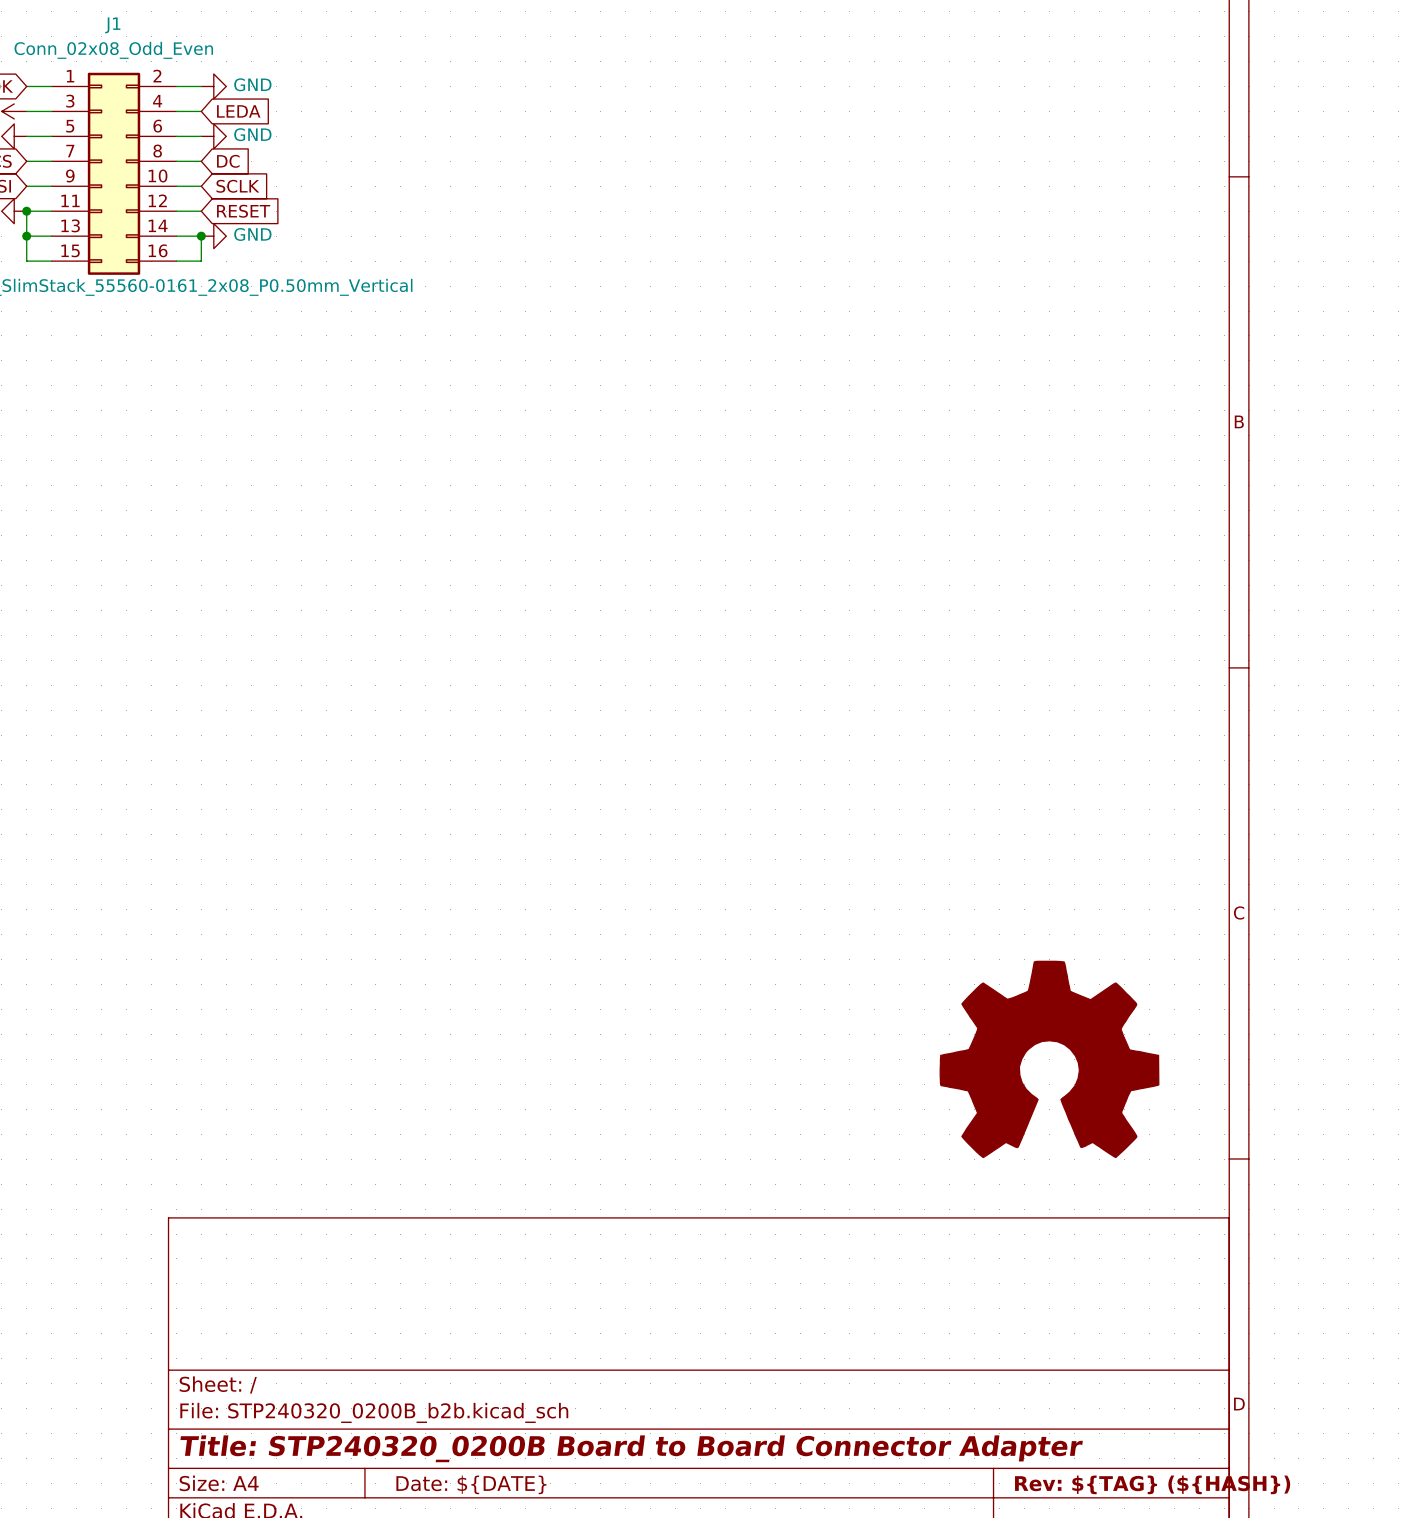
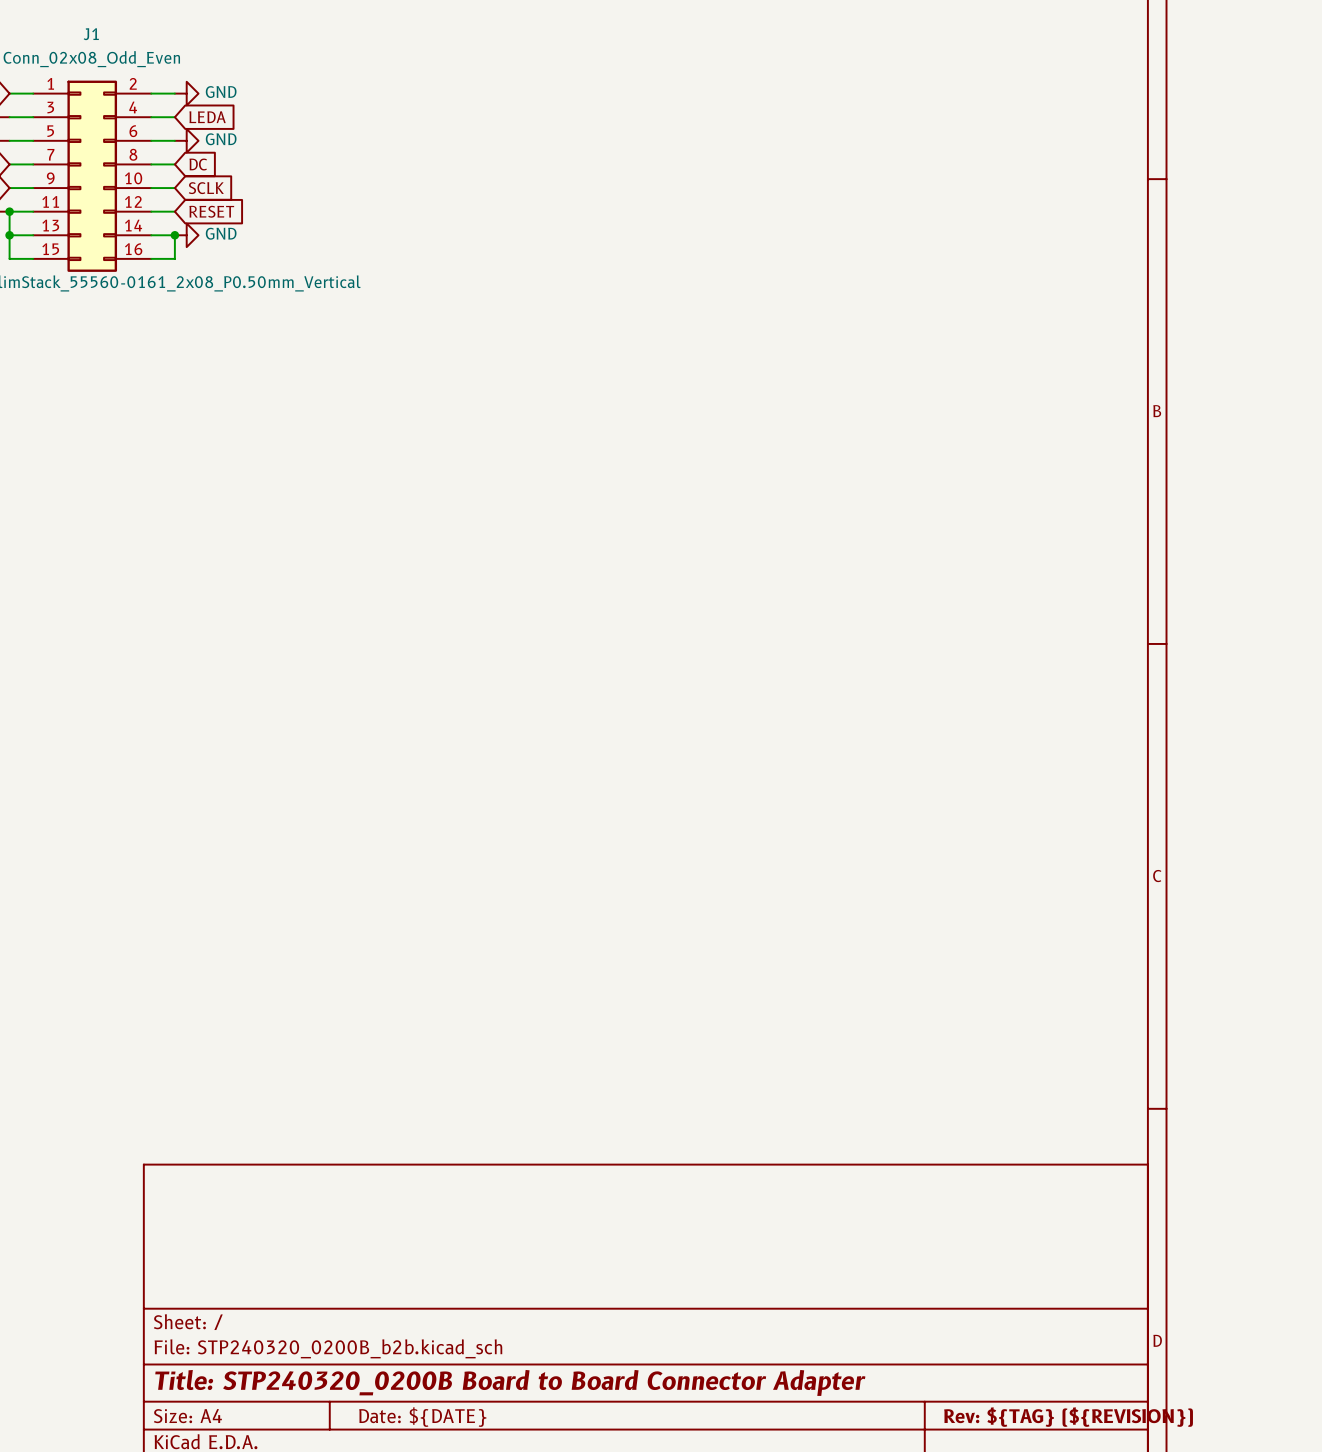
part: (1049, 1059) -> none
title block: Rev: ${TAG} (${HASH}) (1152, 1484) -> Rev: ${TAG} (${REVISION}) (1068, 1417)

